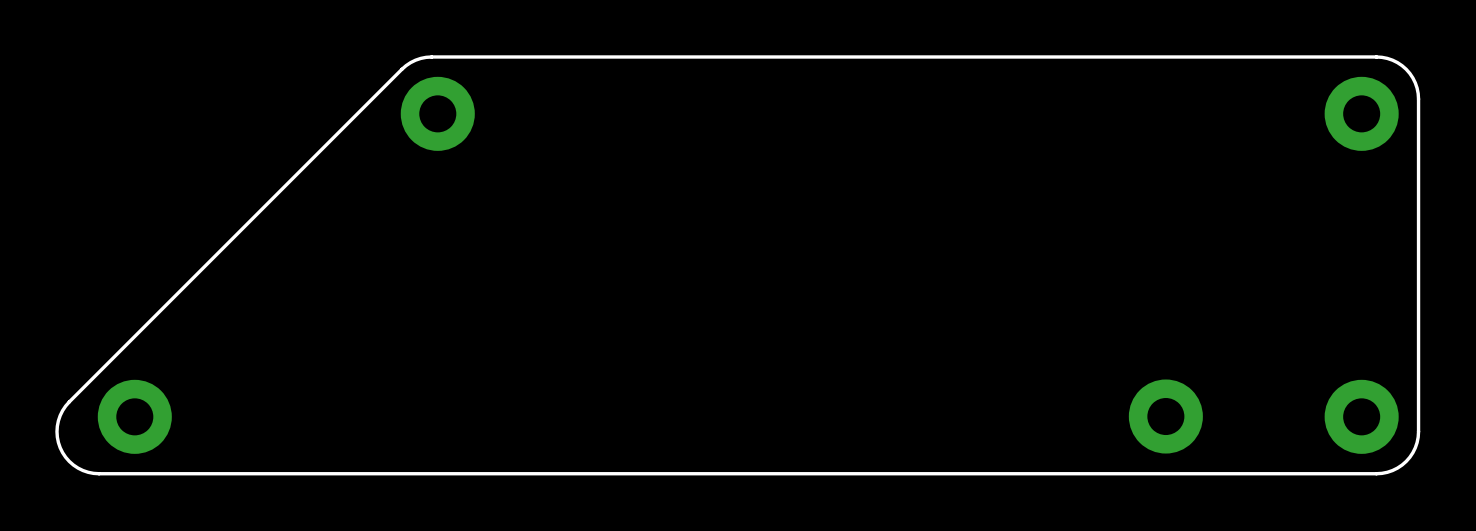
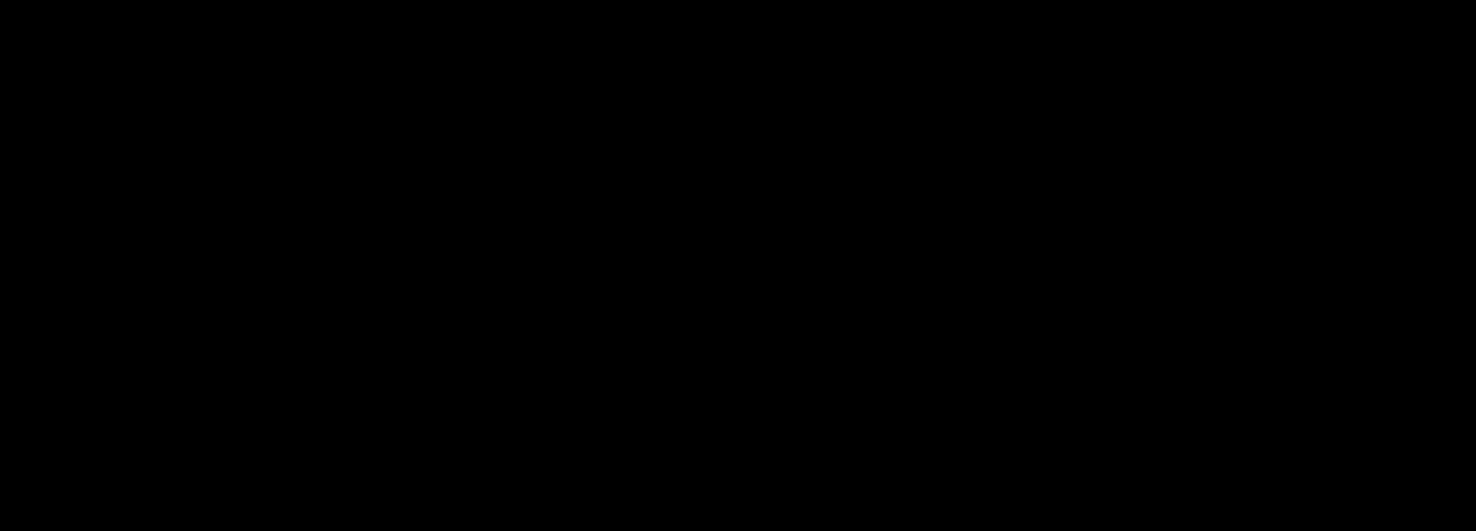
part: (437, 113) -> none
part: (1361, 113) -> none
part: (134, 416) -> none
part: (1165, 416) -> none
part: (1361, 416) -> none
board edge: (99, 473) (88, 472) (73, 465) (60, 447) (57, 426) (65, 406) (401, 69) (420, 58) (1376, 56) (1387, 58) (1402, 65) (1409, 73) (1417, 88) (1418, 437) (1409, 457) (1402, 465) (1387, 472) (99, 473) -> none

